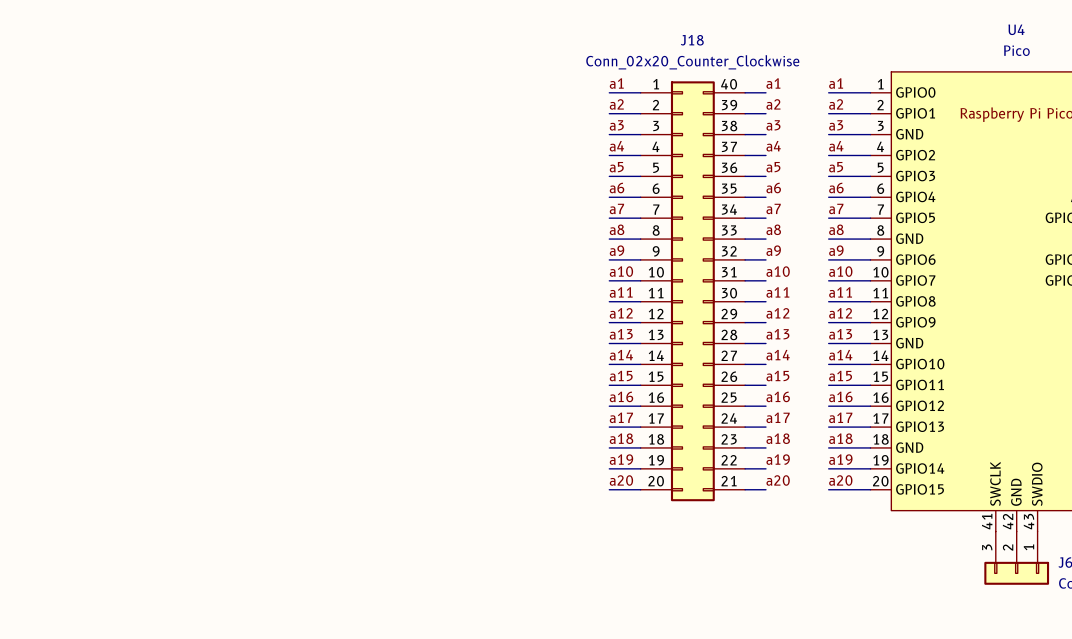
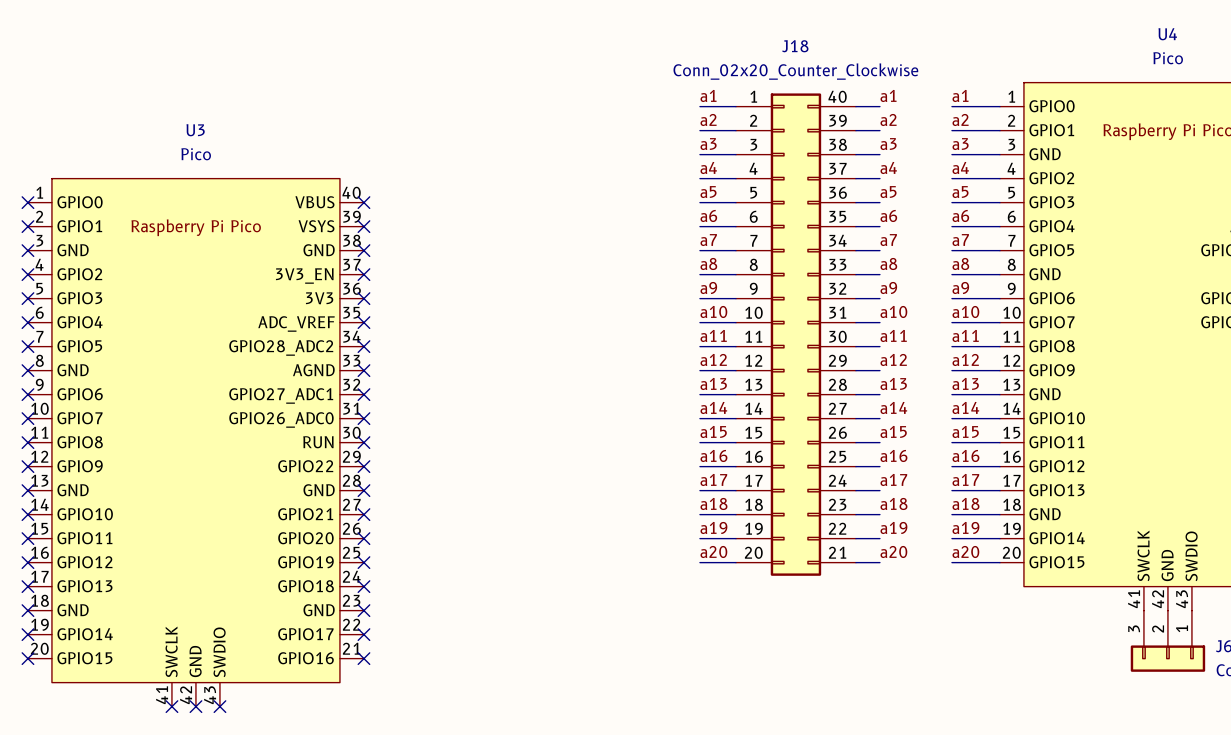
no-connect mark: none -> (27, 202)
no-connect mark: none -> (363, 202)
no-connect mark: none -> (27, 226)
no-connect mark: none -> (363, 226)
no-connect mark: none -> (27, 250)
no-connect mark: none -> (363, 250)
no-connect mark: none -> (27, 274)
no-connect mark: none -> (363, 274)
no-connect mark: none -> (27, 298)
no-connect mark: none -> (363, 298)
no-connect mark: none -> (27, 322)
no-connect mark: none -> (363, 322)
no-connect mark: none -> (27, 346)
no-connect mark: none -> (363, 346)
no-connect mark: none -> (27, 370)
no-connect mark: none -> (363, 370)
no-connect mark: none -> (27, 394)
no-connect mark: none -> (363, 394)
no-connect mark: none -> (27, 418)
no-connect mark: none -> (363, 418)
no-connect mark: none -> (27, 442)
U3: none -> Pico (195, 442)
no-connect mark: none -> (363, 442)
no-connect mark: none -> (27, 466)
no-connect mark: none -> (363, 466)
no-connect mark: none -> (27, 490)
no-connect mark: none -> (363, 490)
no-connect mark: none -> (27, 514)
no-connect mark: none -> (363, 514)
no-connect mark: none -> (27, 538)
no-connect mark: none -> (363, 538)
no-connect mark: none -> (27, 562)
no-connect mark: none -> (363, 562)
no-connect mark: none -> (27, 586)
no-connect mark: none -> (363, 586)
no-connect mark: none -> (27, 610)
no-connect mark: none -> (363, 610)
no-connect mark: none -> (27, 634)
no-connect mark: none -> (363, 634)
no-connect mark: none -> (27, 658)
no-connect mark: none -> (363, 658)
no-connect mark: none -> (171, 706)
no-connect mark: none -> (195, 706)
no-connect mark: none -> (219, 706)

